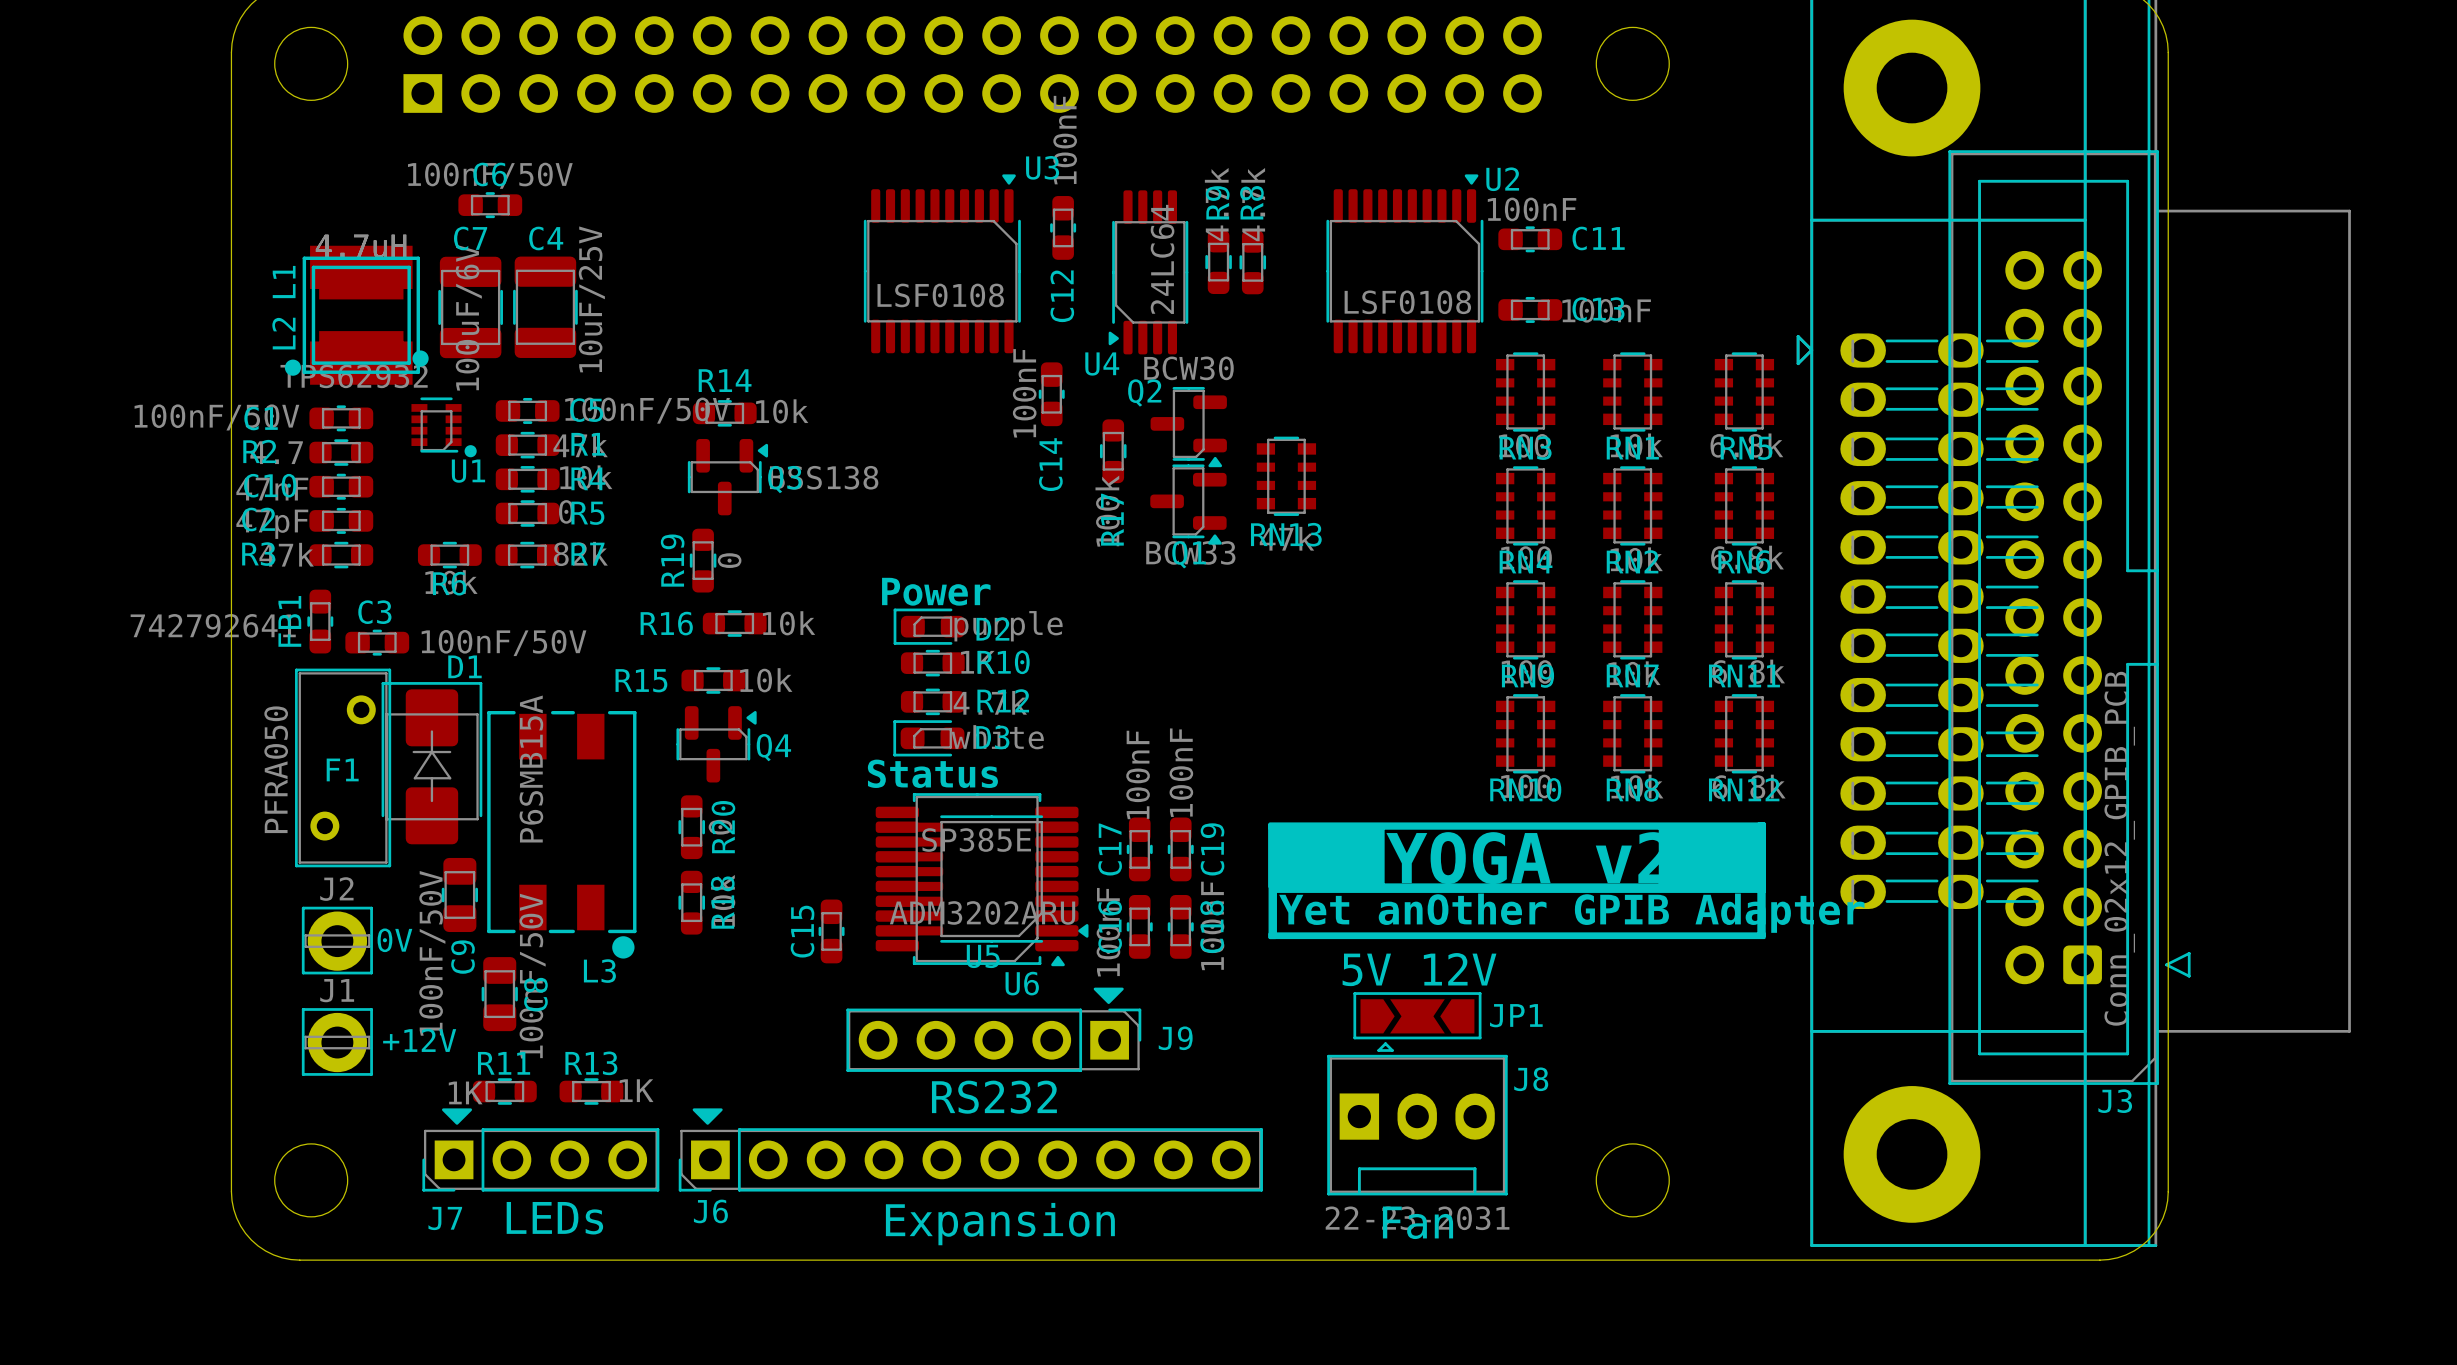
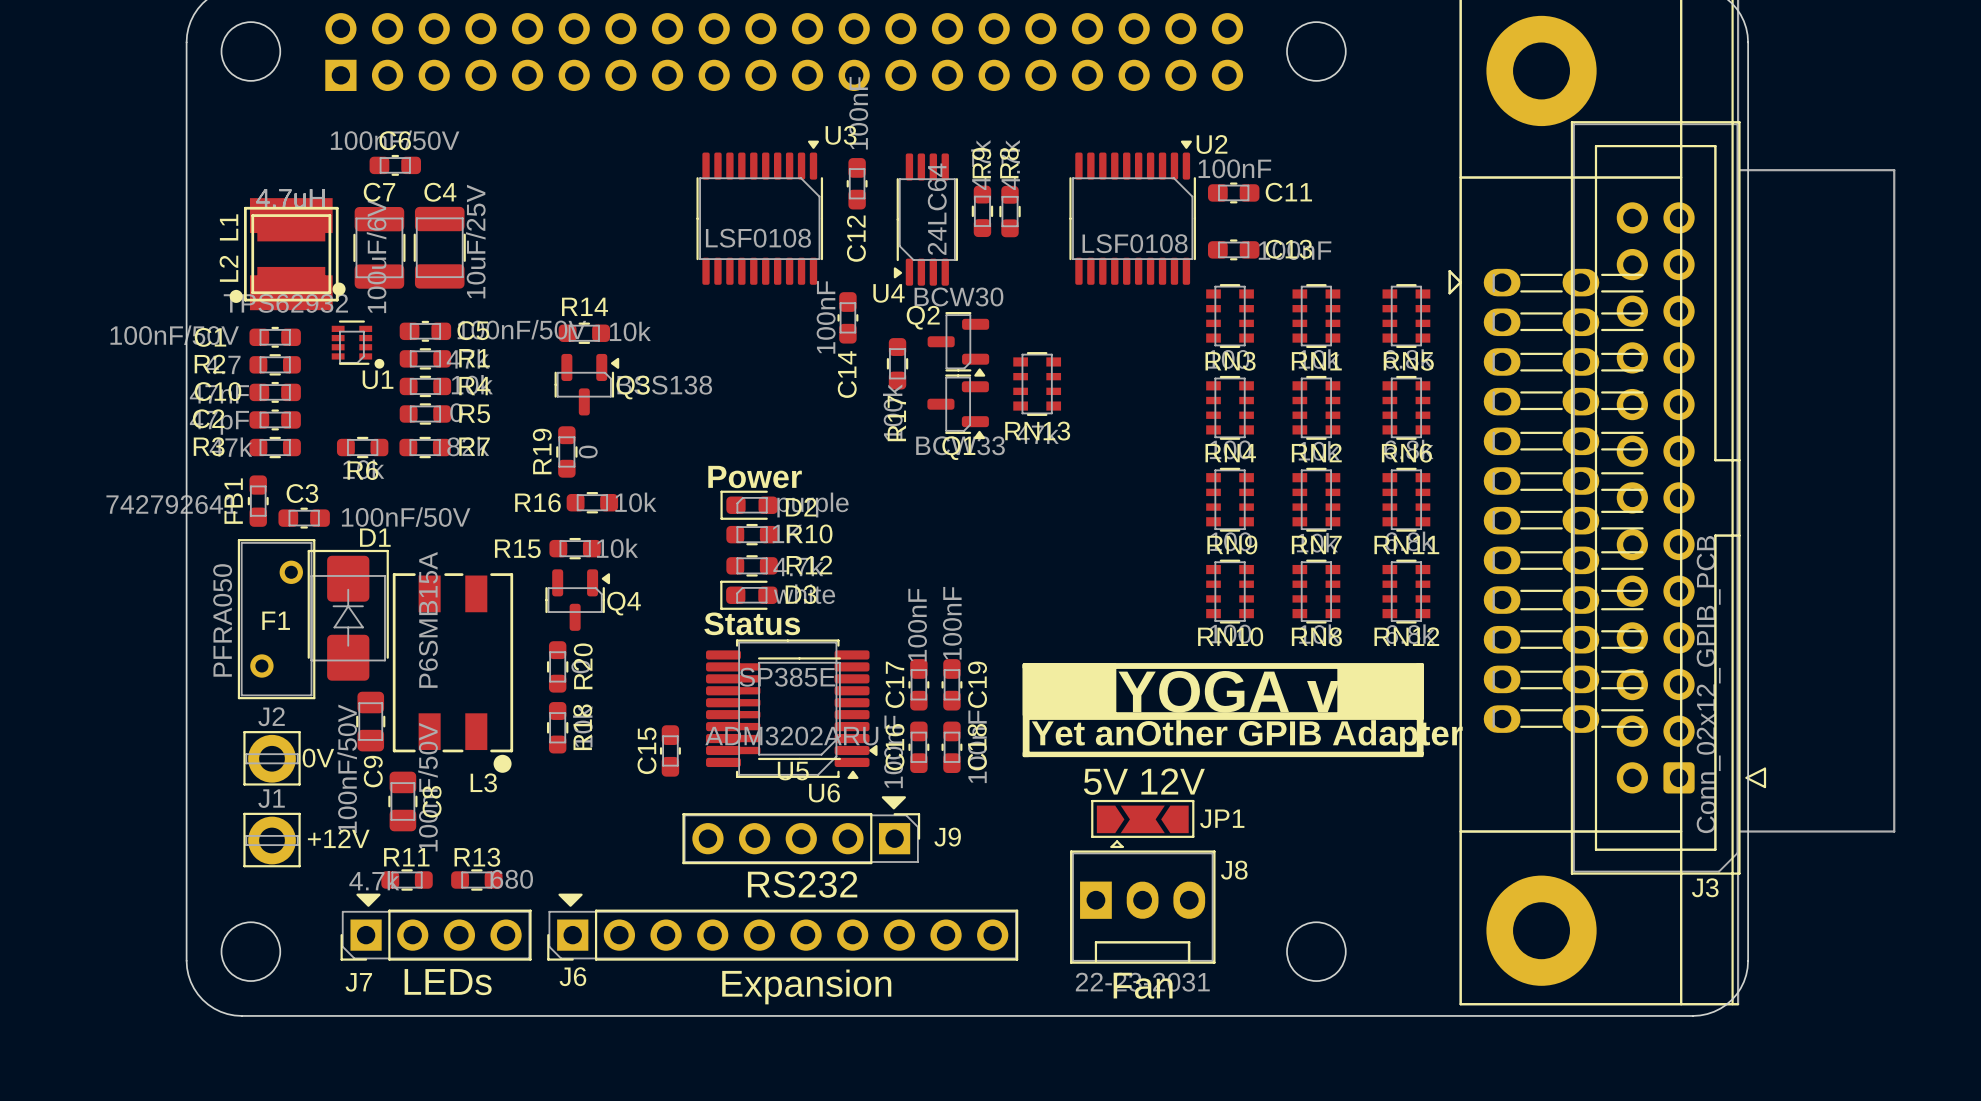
R13 value: 1K (636, 1090) -> 680 (511, 879)
R11 value: 1K (465, 1092) -> 4.7k (374, 880)

